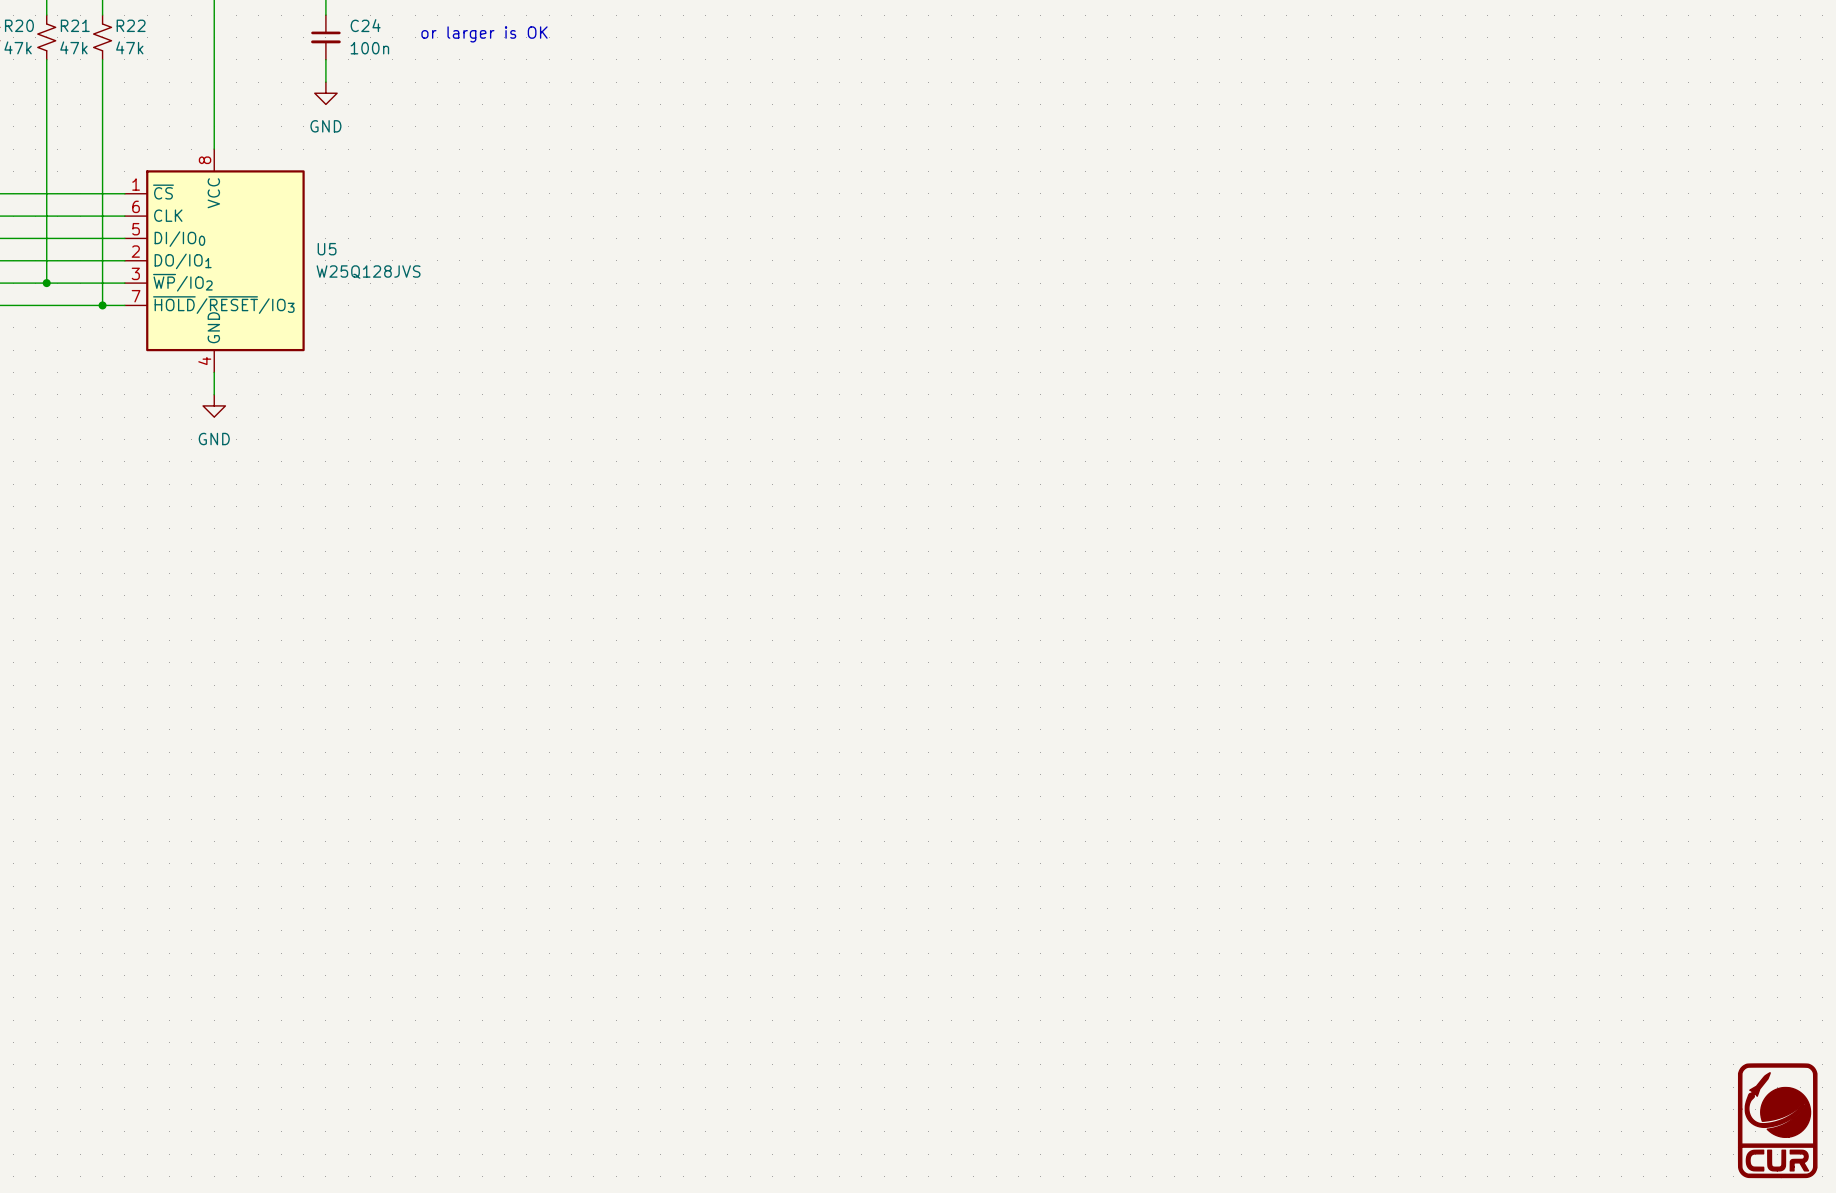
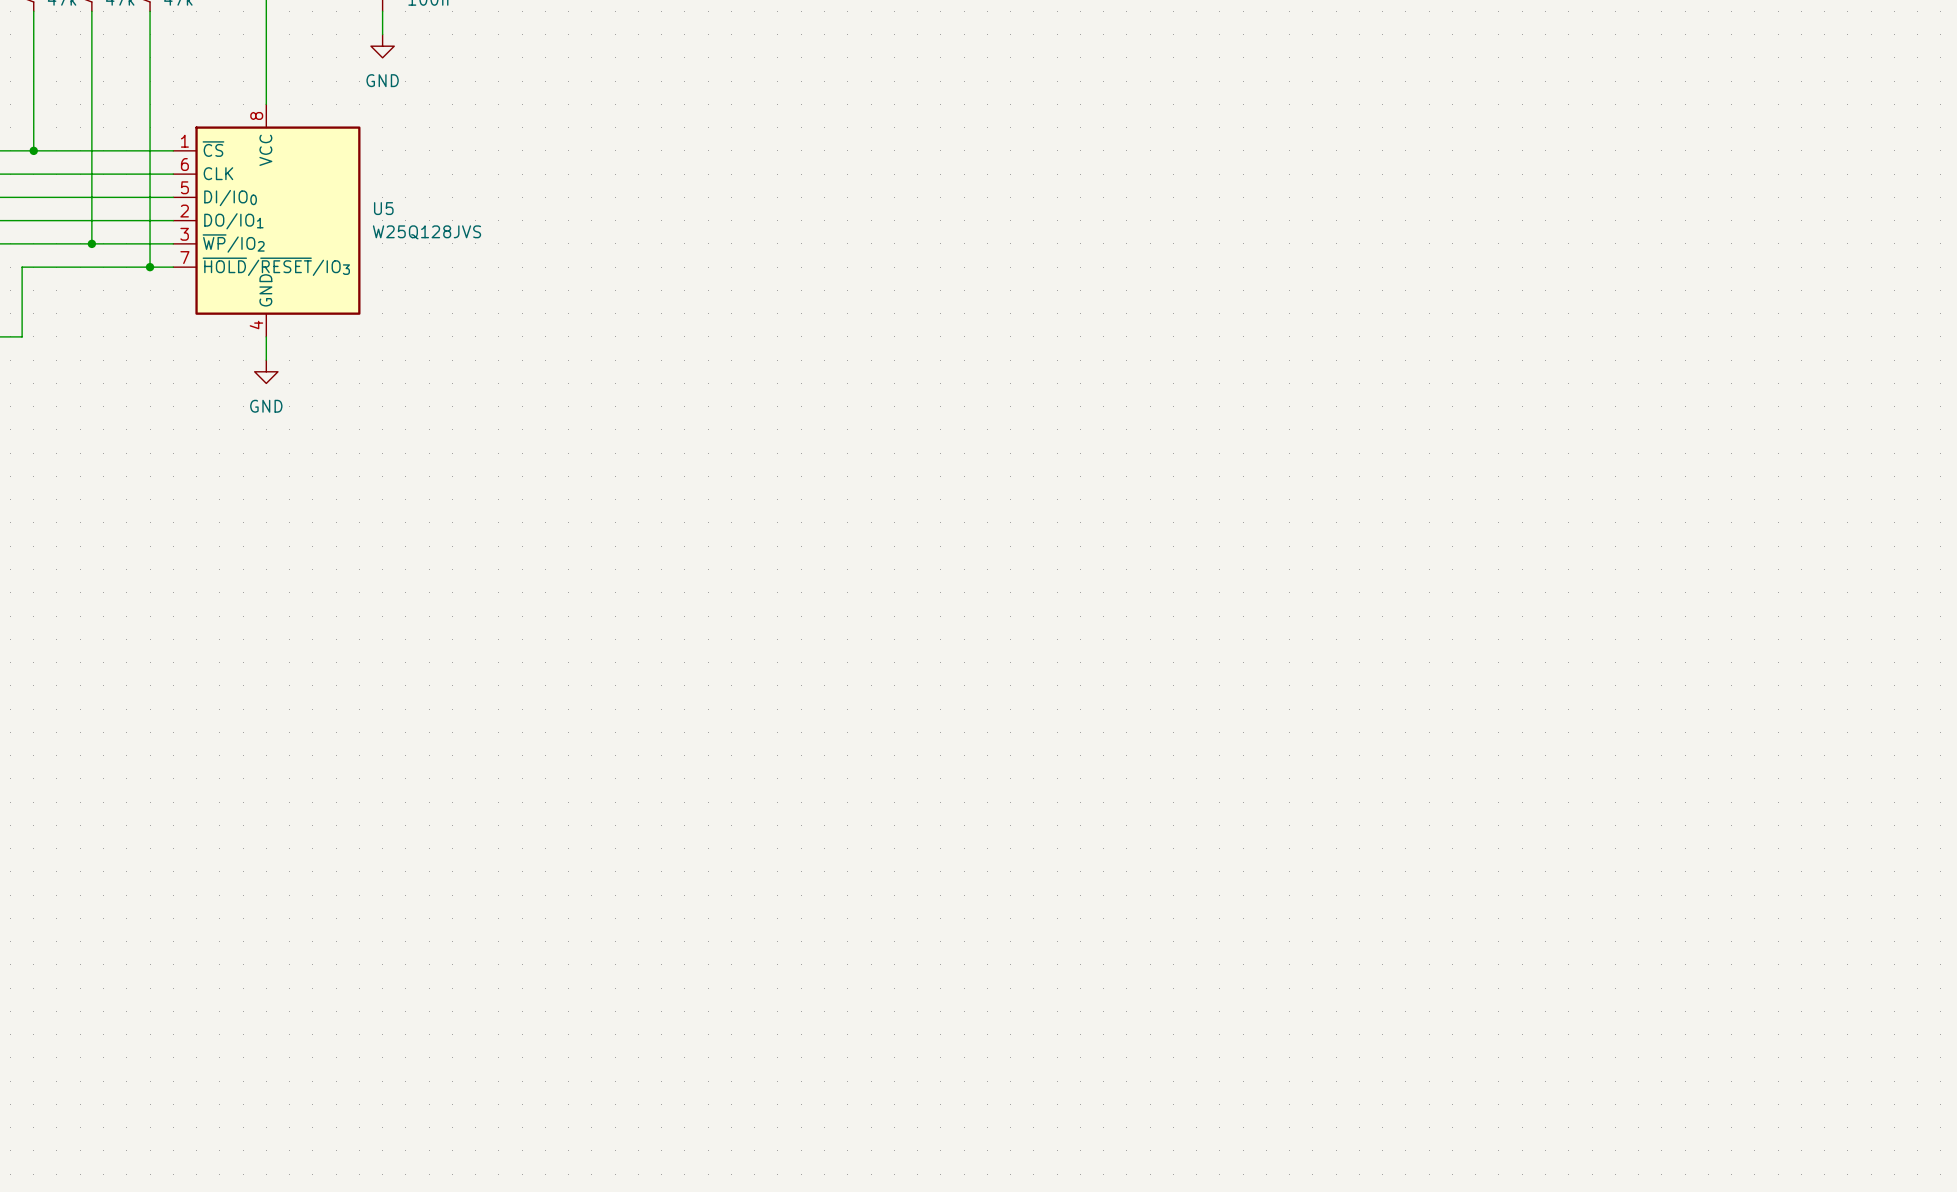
power symbol: (1777, 1120) -> none

